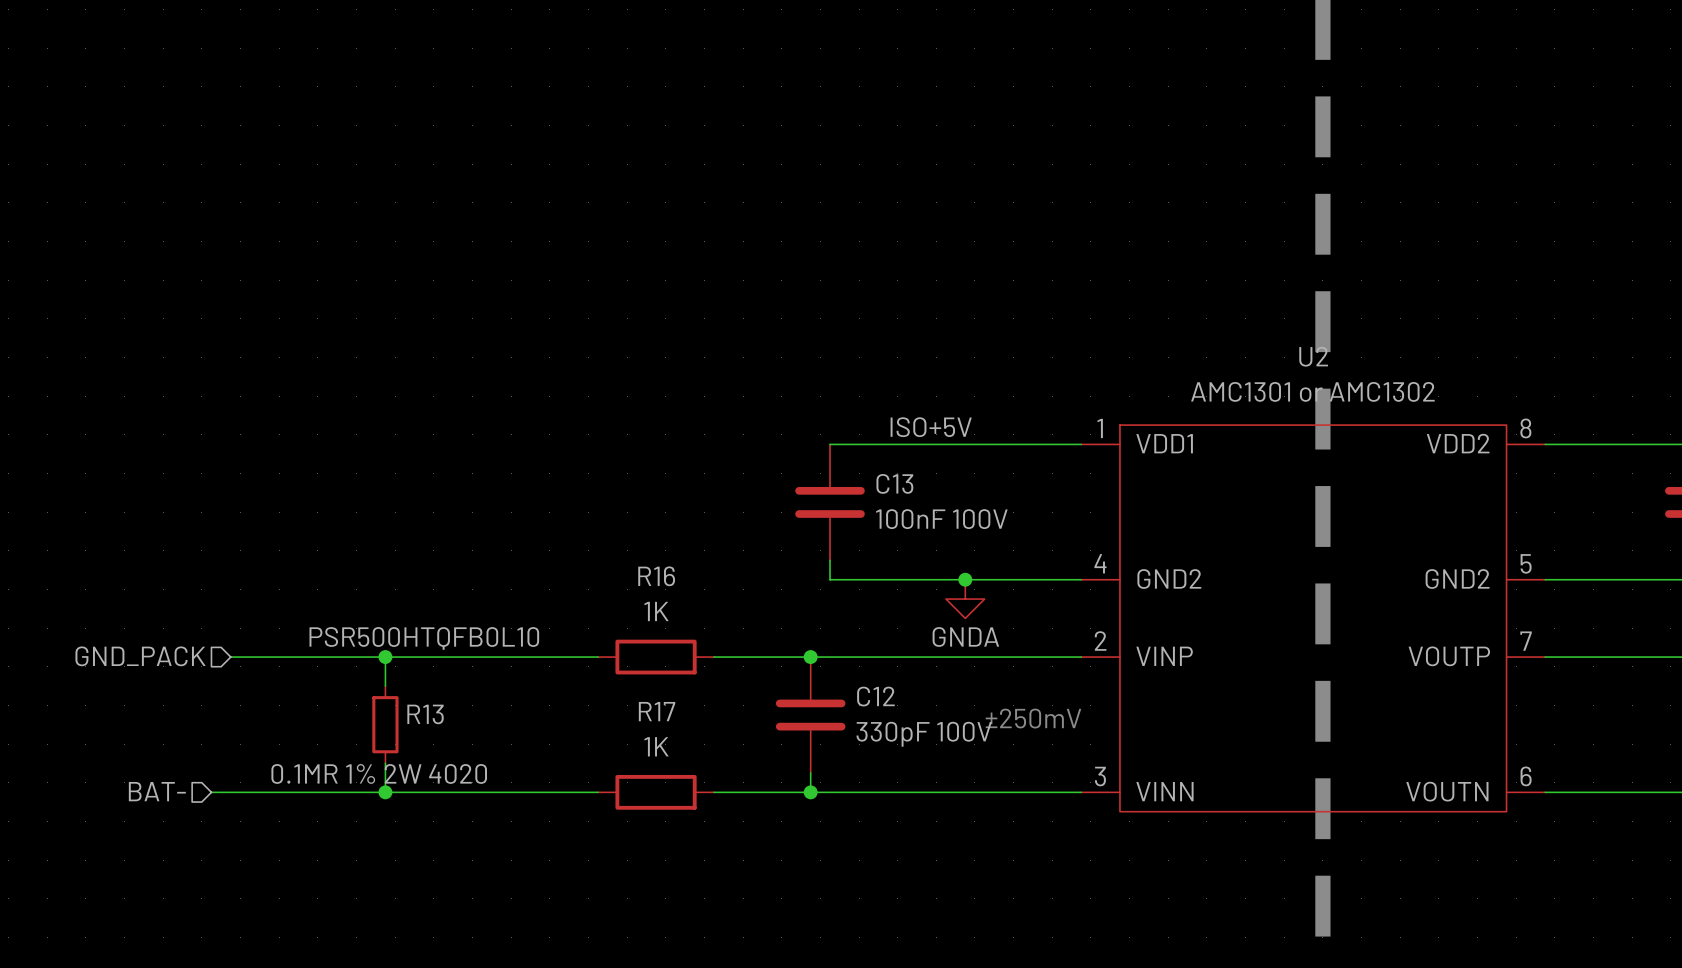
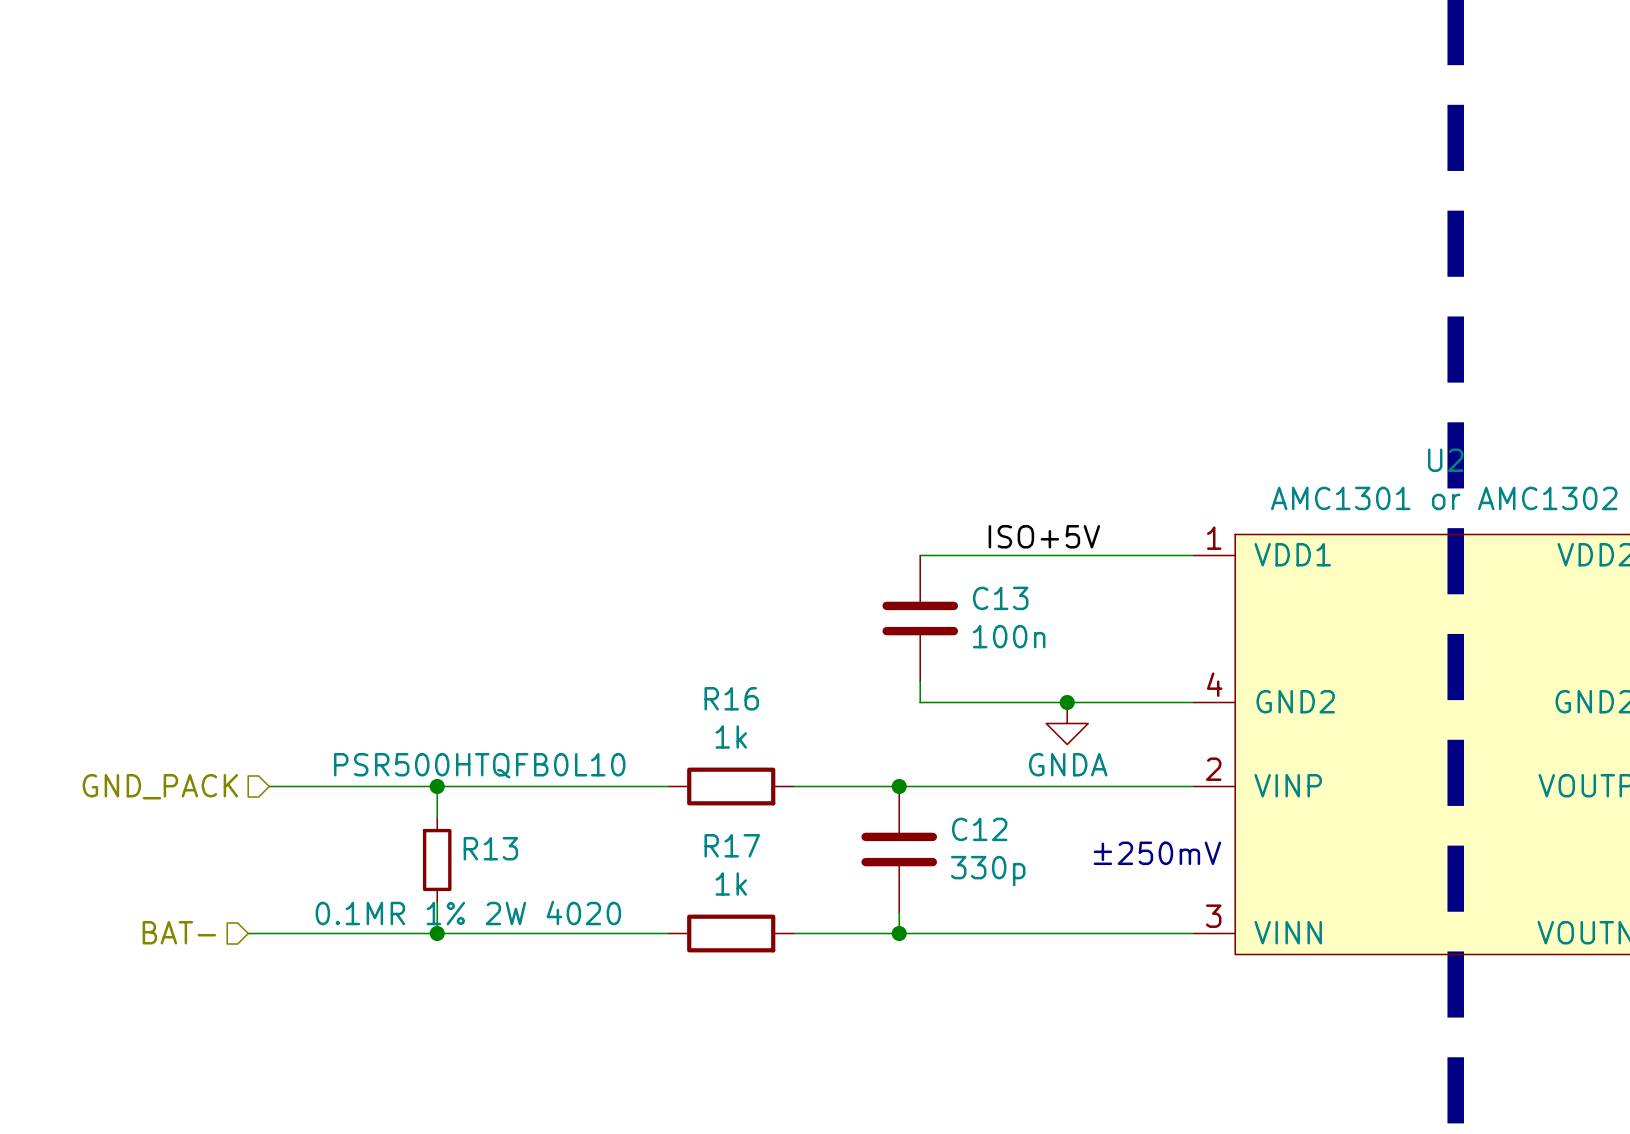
C13 value: 100nF 100V (941, 519) -> 100n (1009, 636)
R16 value: 1K (656, 611) -> 1k (731, 736)
C12 value: 330pF 100V (924, 734) -> 330p (988, 871)
R17 value: 1K (656, 746) -> 1k (731, 884)

